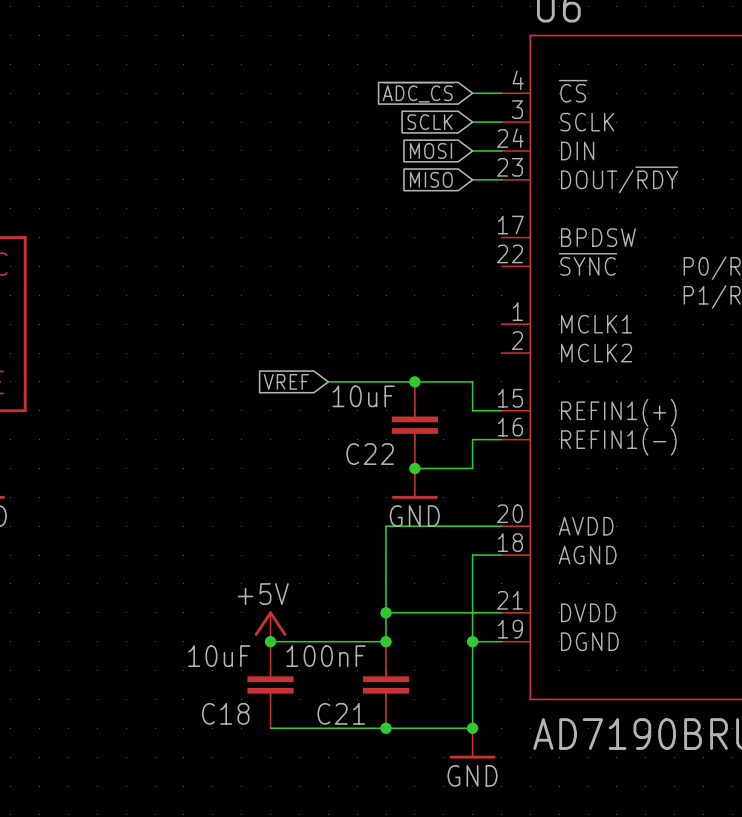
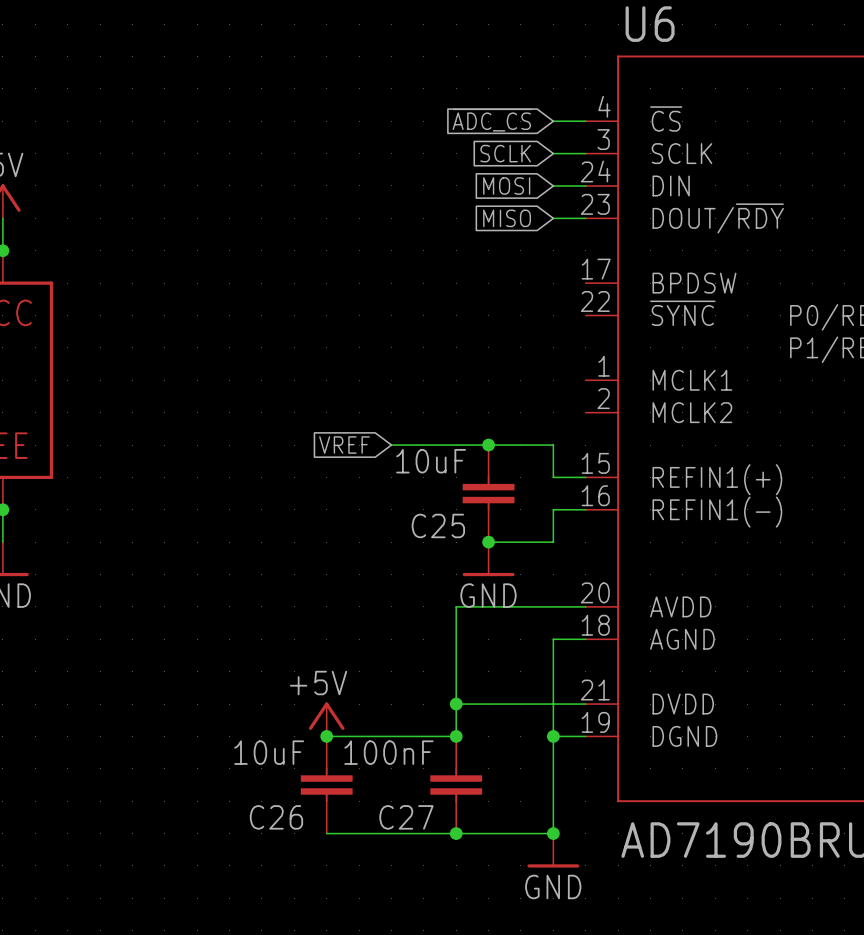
C22 name: C22 (370, 454) -> C25 (438, 525)
C18 name: C18 (225, 713) -> C26 (276, 817)
C21 name: C21 (341, 713) -> C27 (406, 817)

